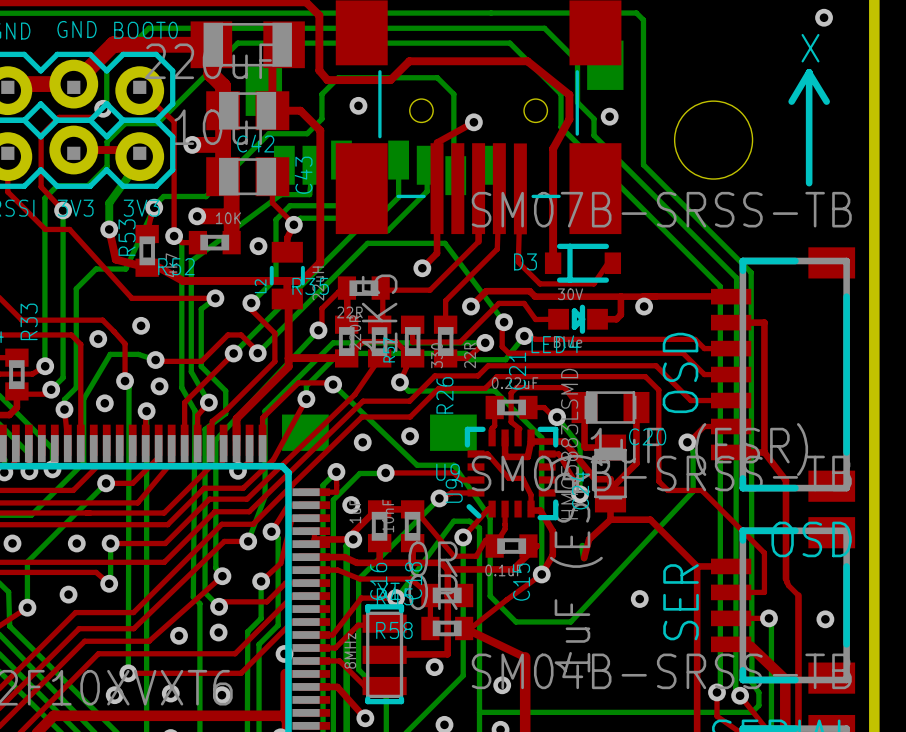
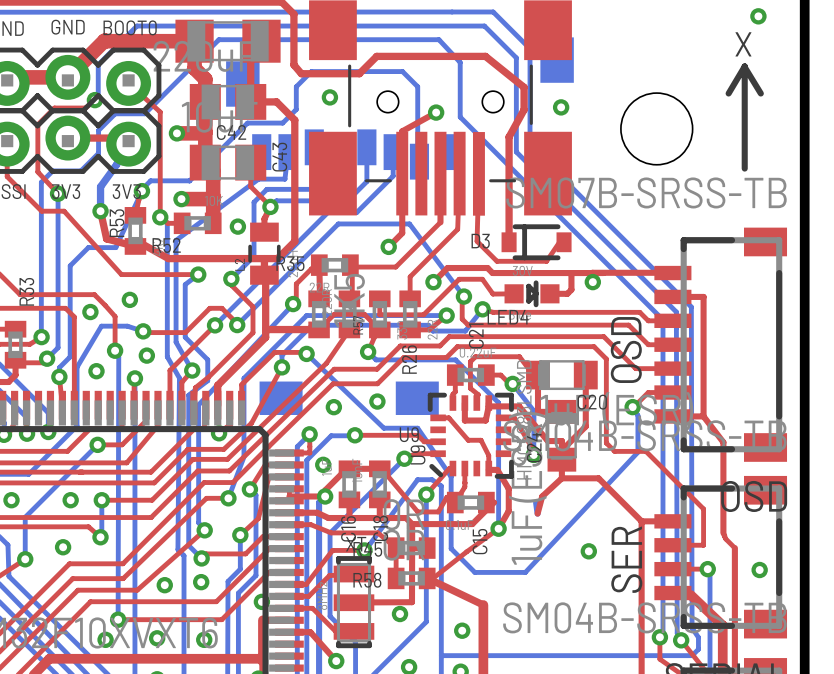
bottom track: (535, 13) (636, 13) (643, 20) (643, 164) (751, 272) (751, 682) -> (493, 11) (530, 48) (530, 145) (691, 307) (692, 628)
bottom track: (526, 28) (544, 28) (577, 61) (577, 102) (594, 118) (594, 135) (736, 278) (735, 688) -> (516, 117) (516, 151) (676, 312) (677, 633)
bottom track: (476, 43) (509, 43) (561, 94) -> (484, 26) (516, 57) (516, 86)
bottom track: (561, 127) (720, 286) (720, 347) -> (438, 39) (460, 62) (460, 117) (662, 319)

